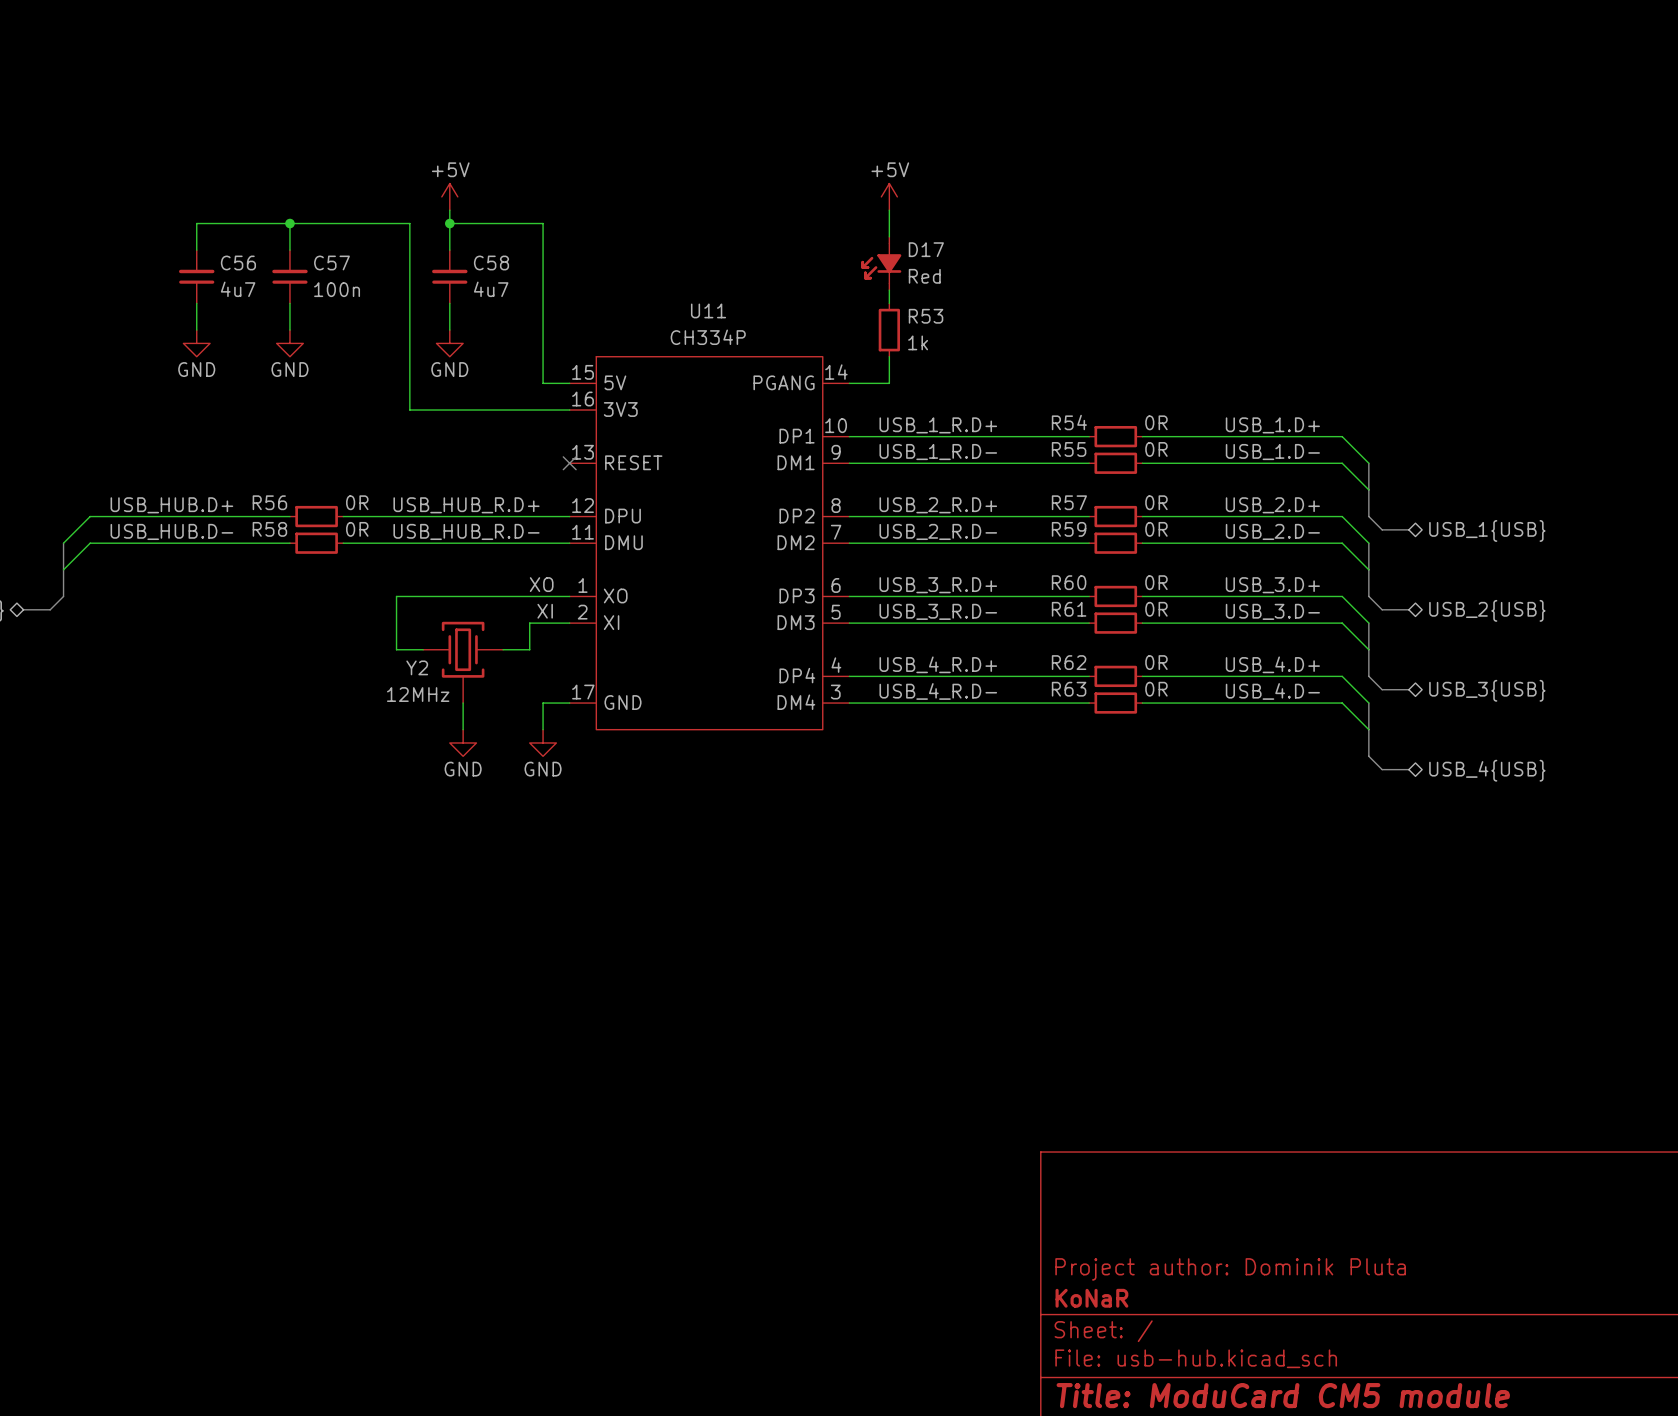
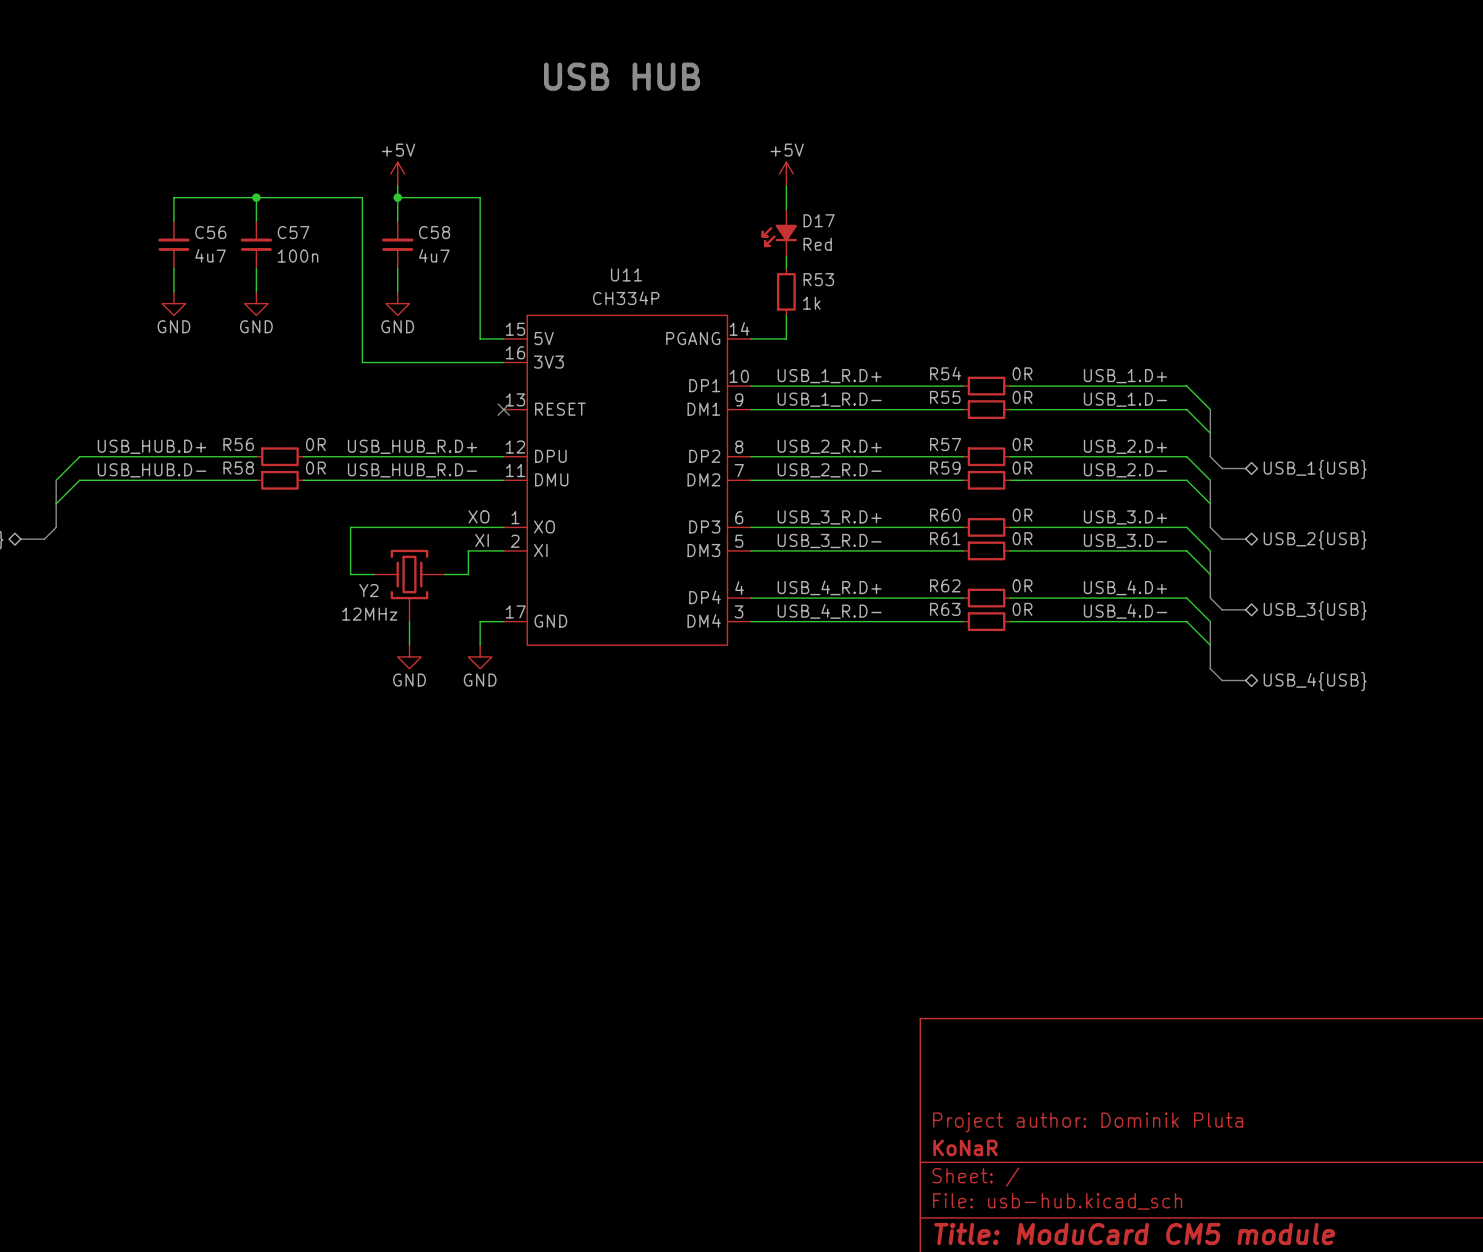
text: none -> USB HUB (622, 76)

